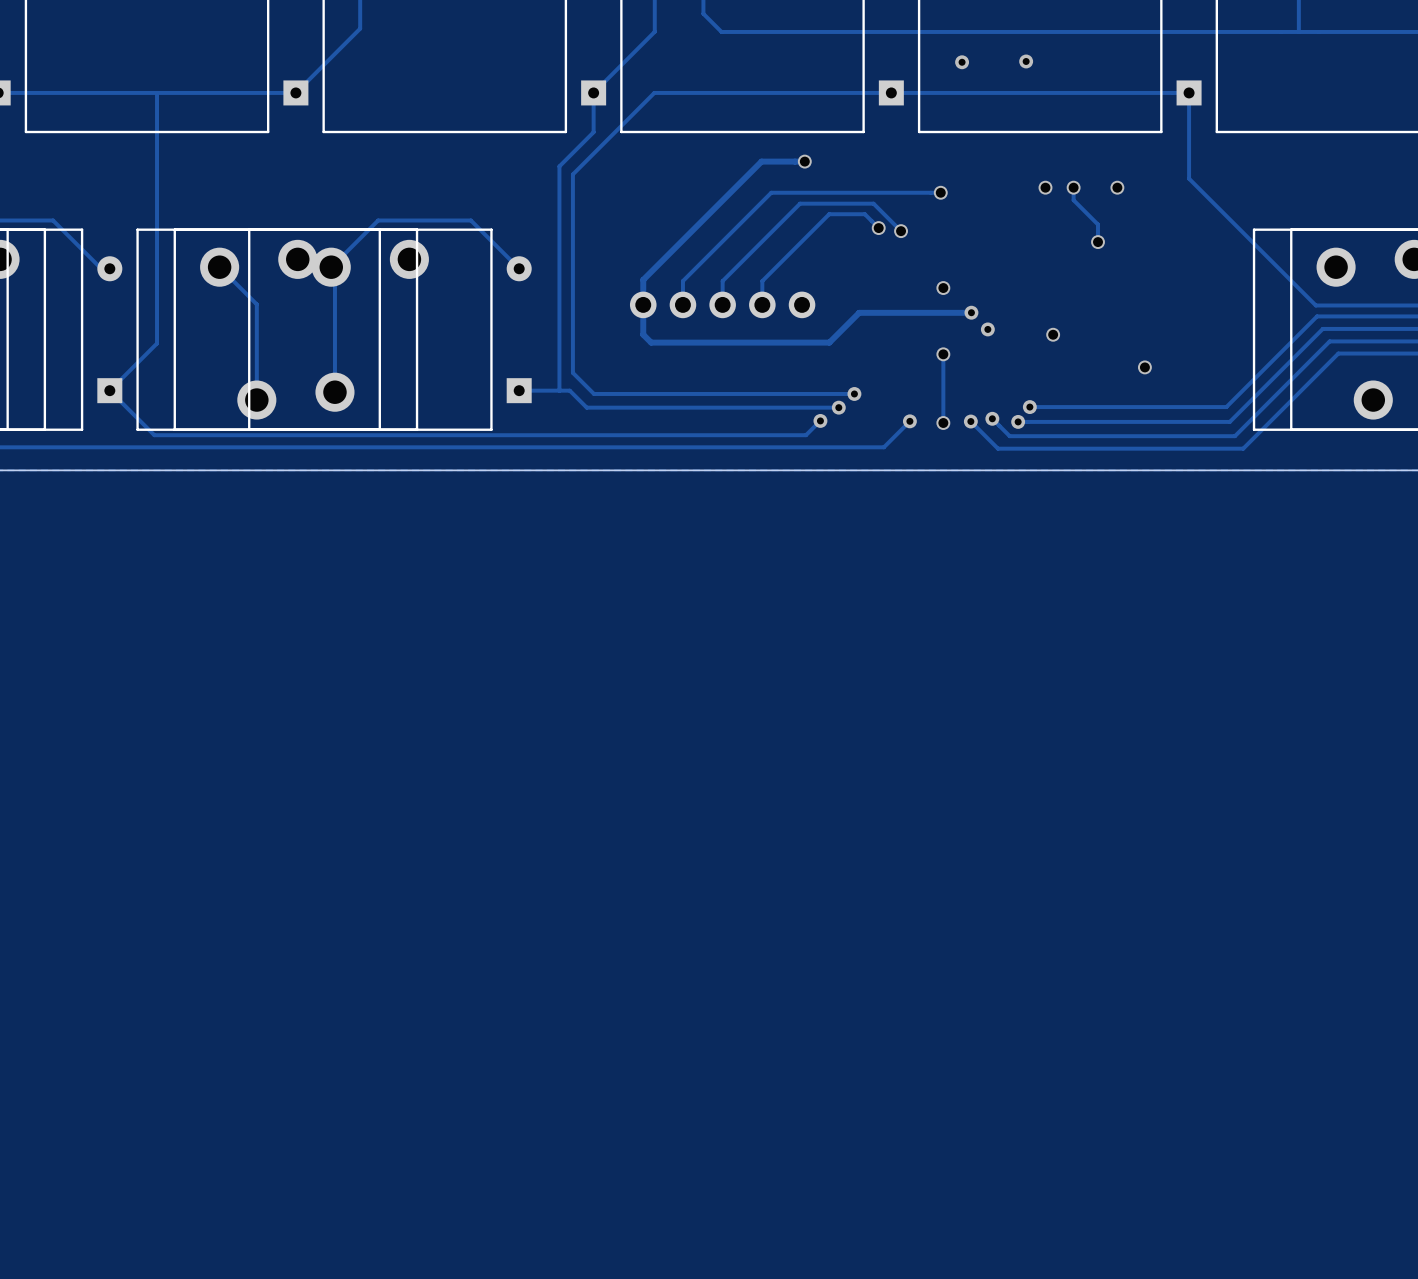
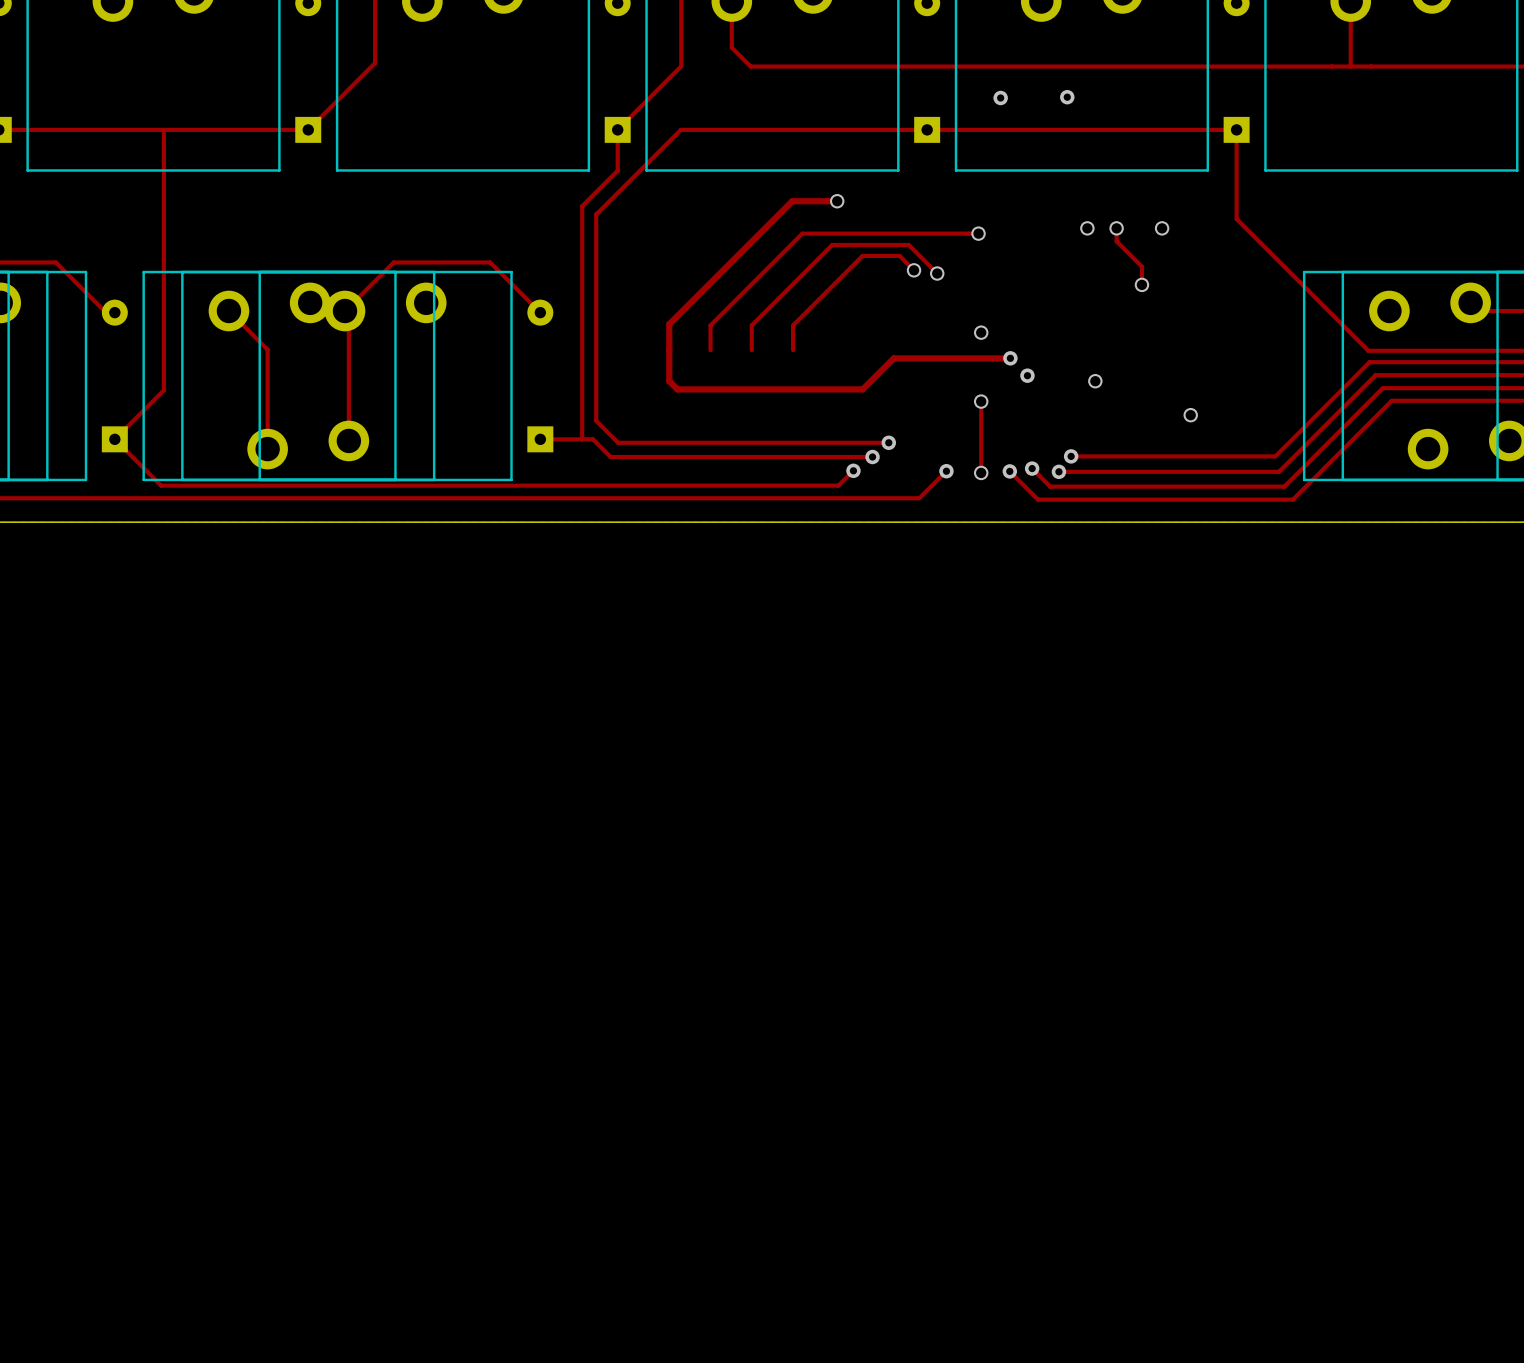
part: (643, 304) -> none
part: (682, 304) -> none
part: (722, 304) -> none
part: (762, 304) -> none
part: (802, 304) -> none

